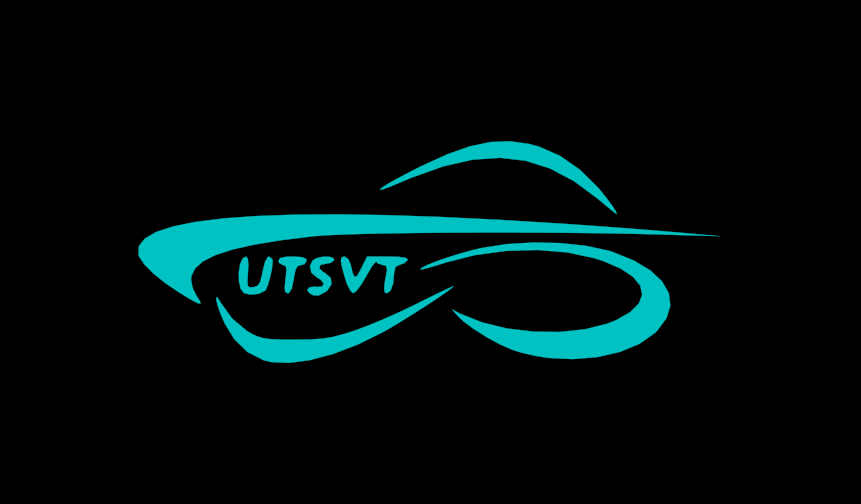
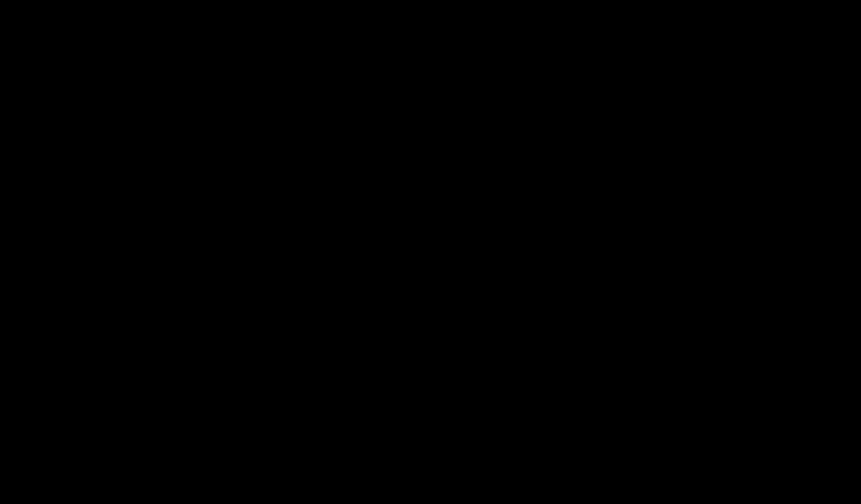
drawing: [138, 141, 721, 364] -> none

